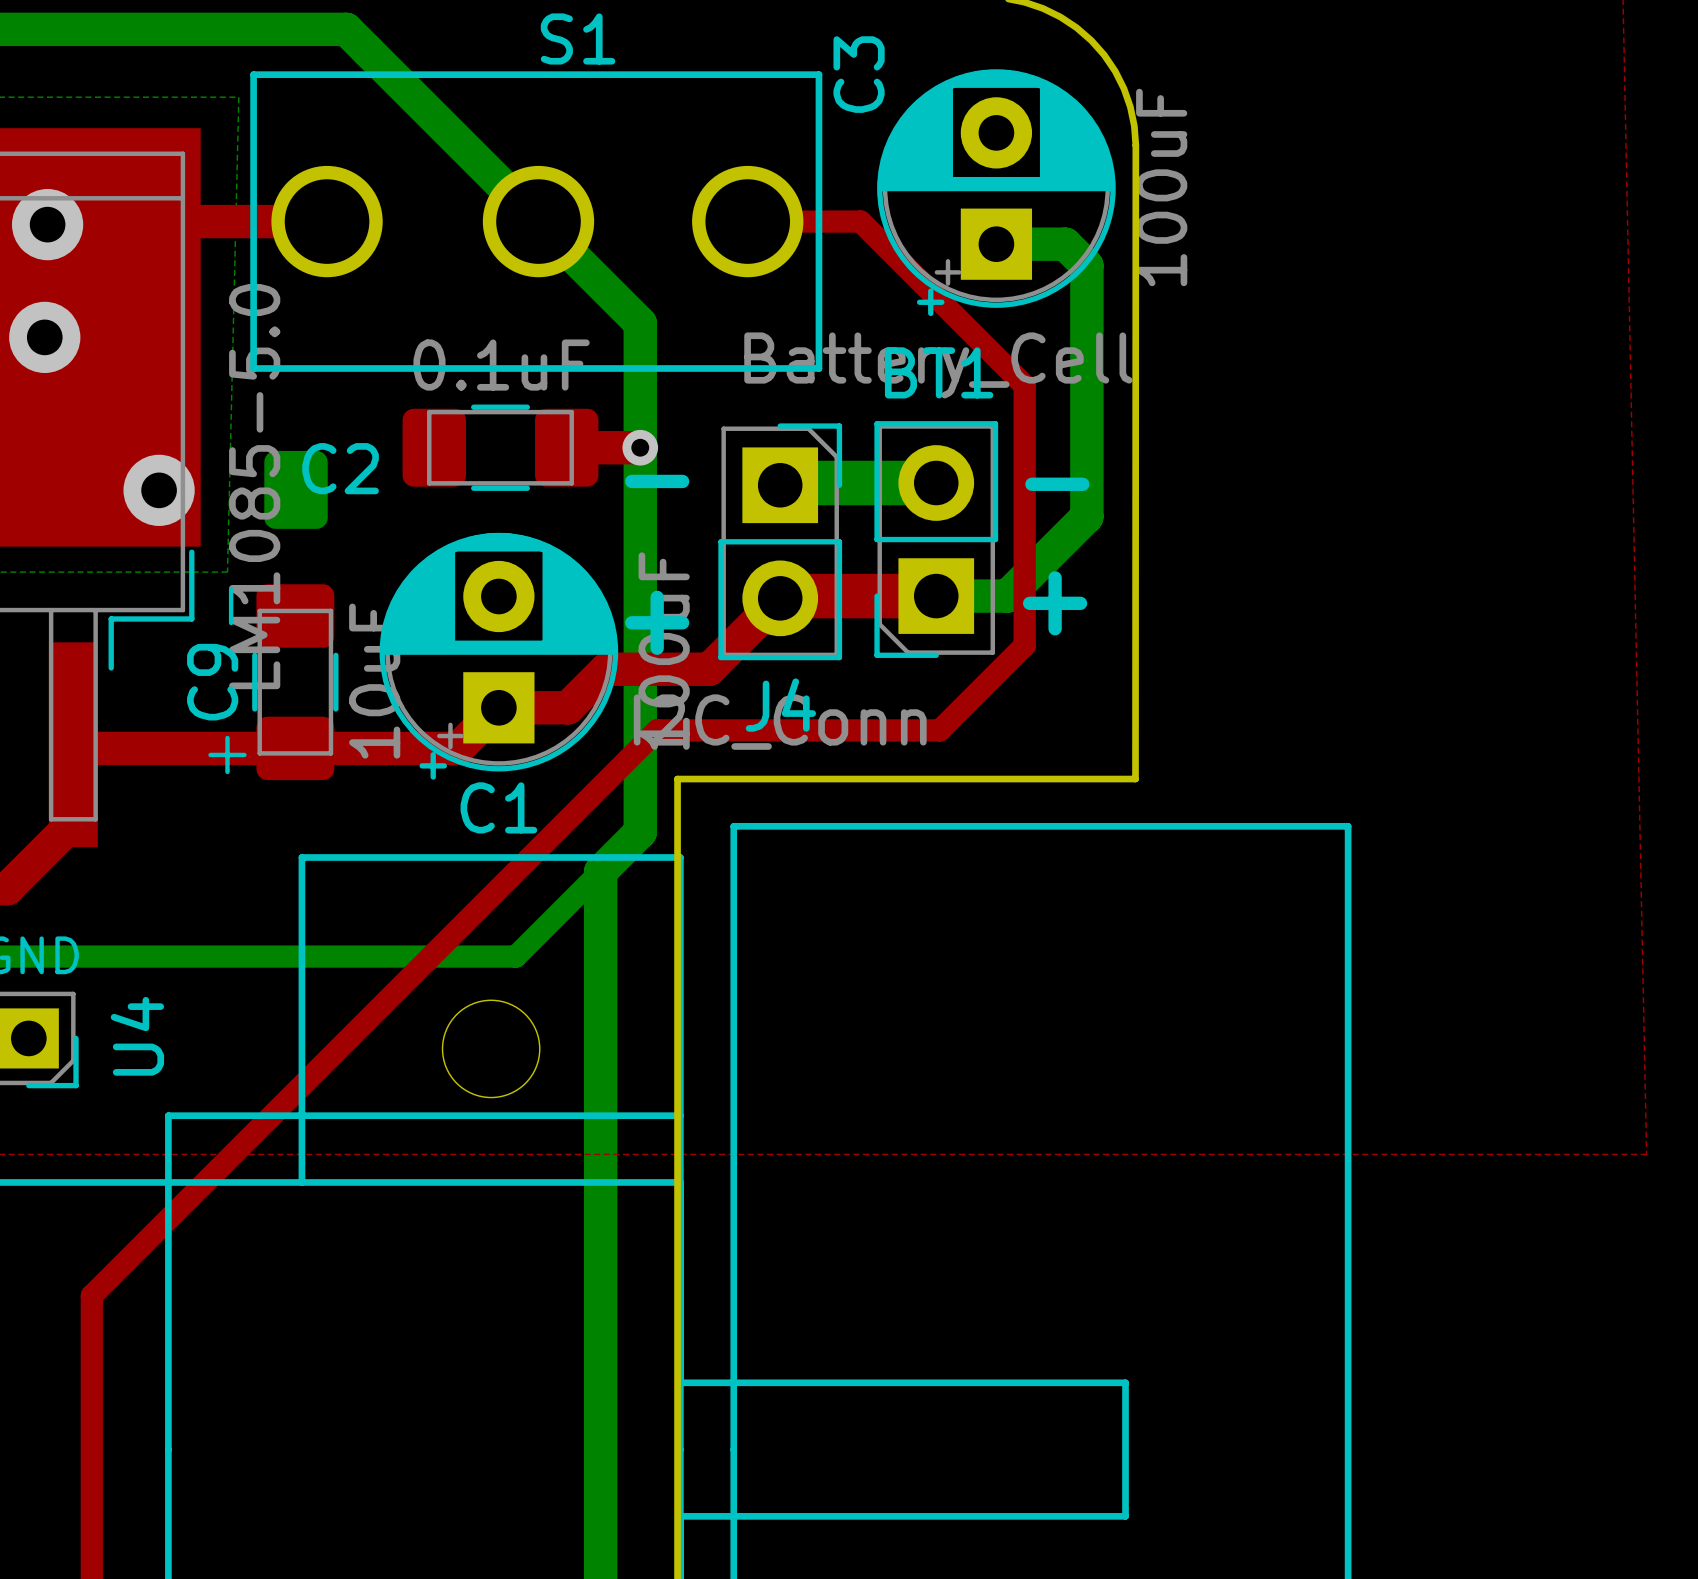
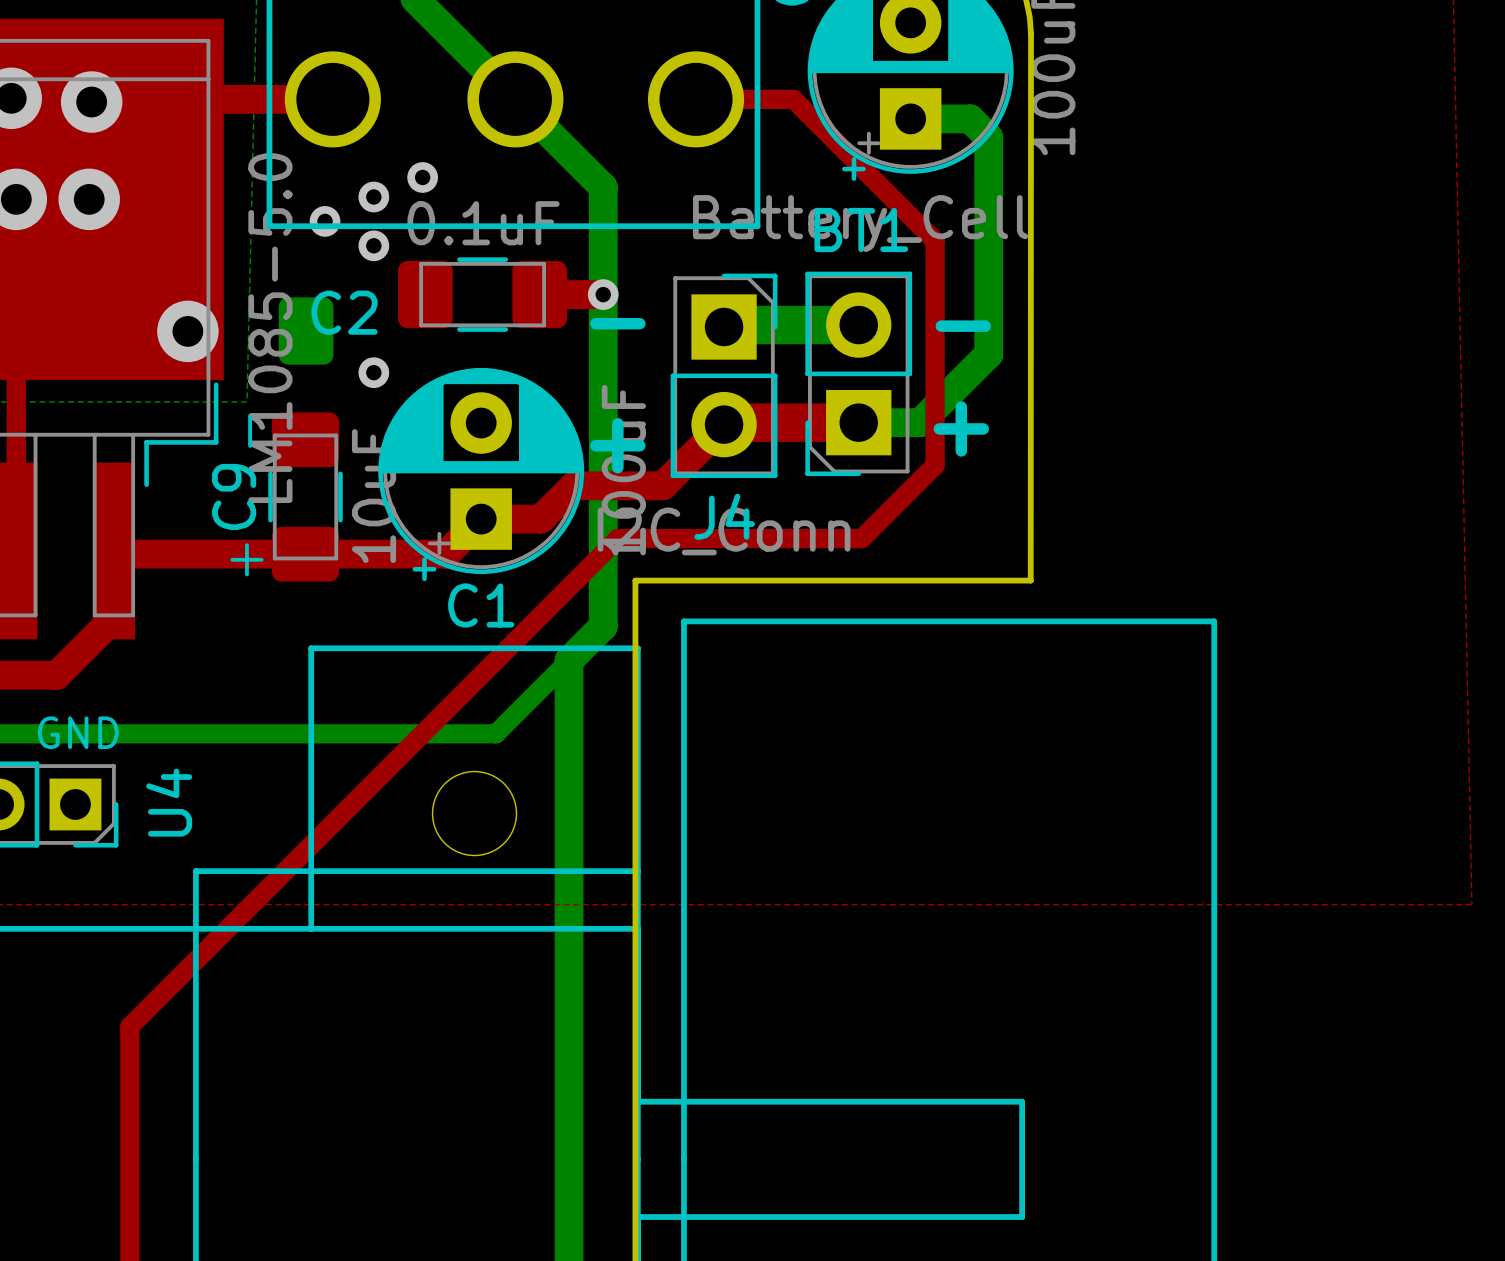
via: none -> (422, 177)
via: none -> (373, 196)
via: none -> (325, 221)
via: none -> (373, 245)
via: none -> (373, 372)

